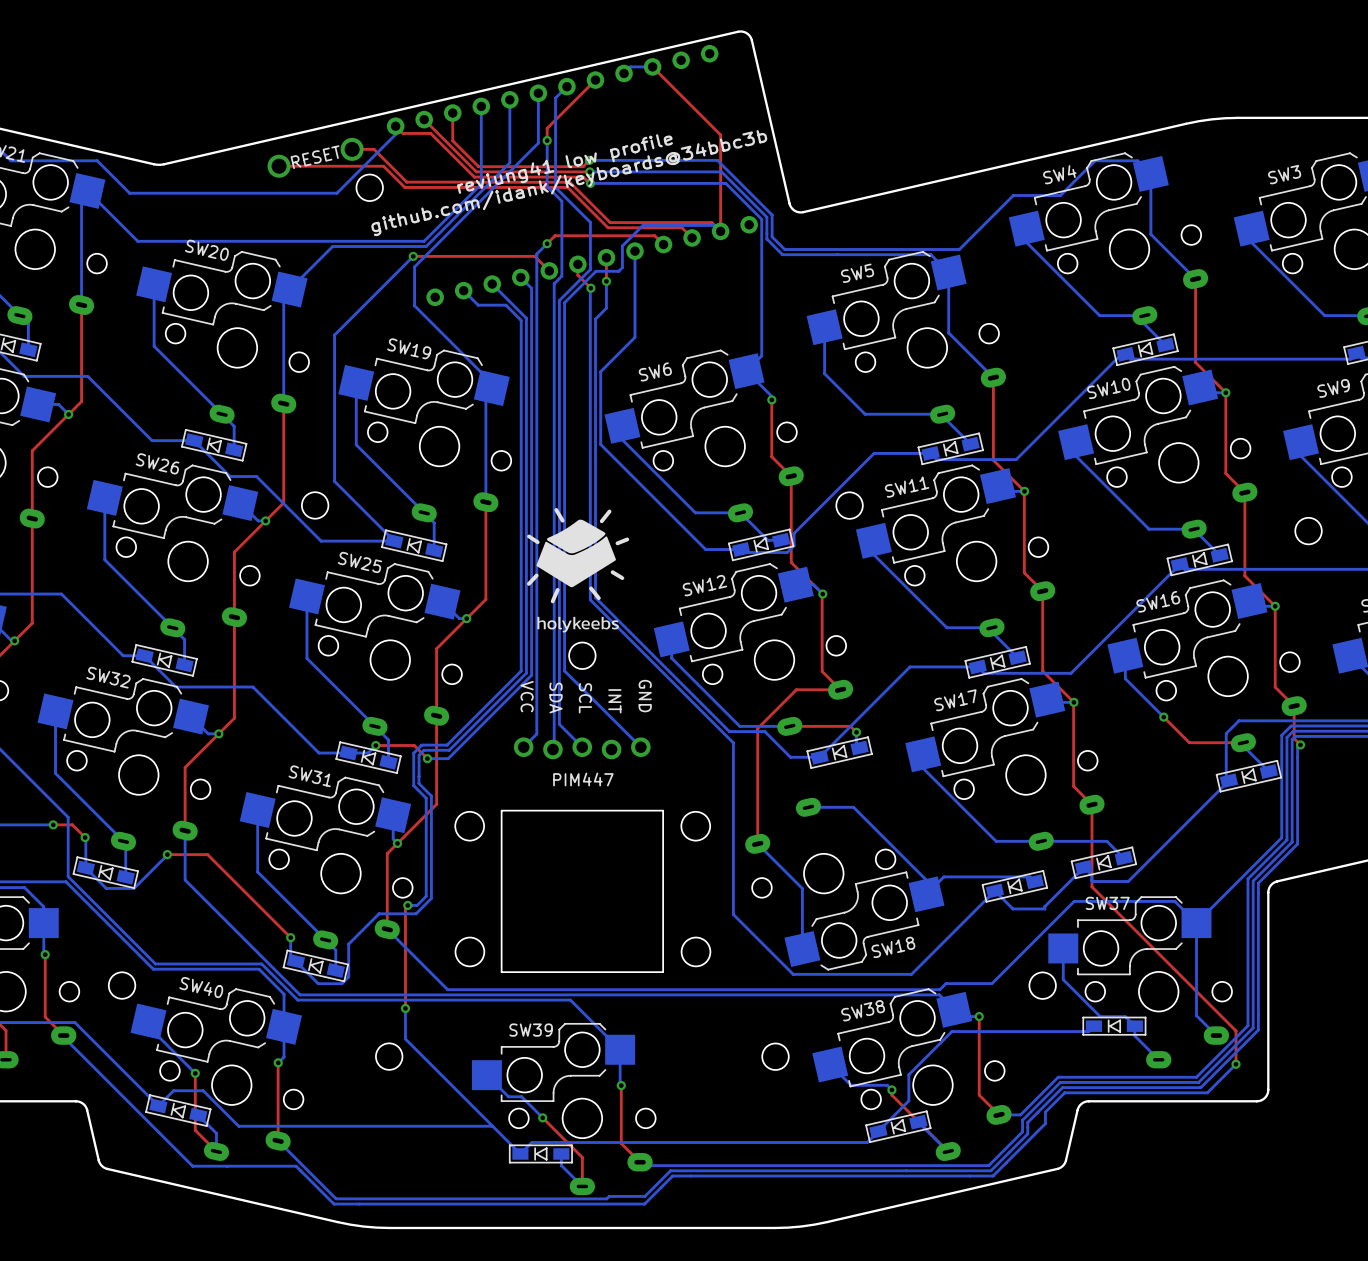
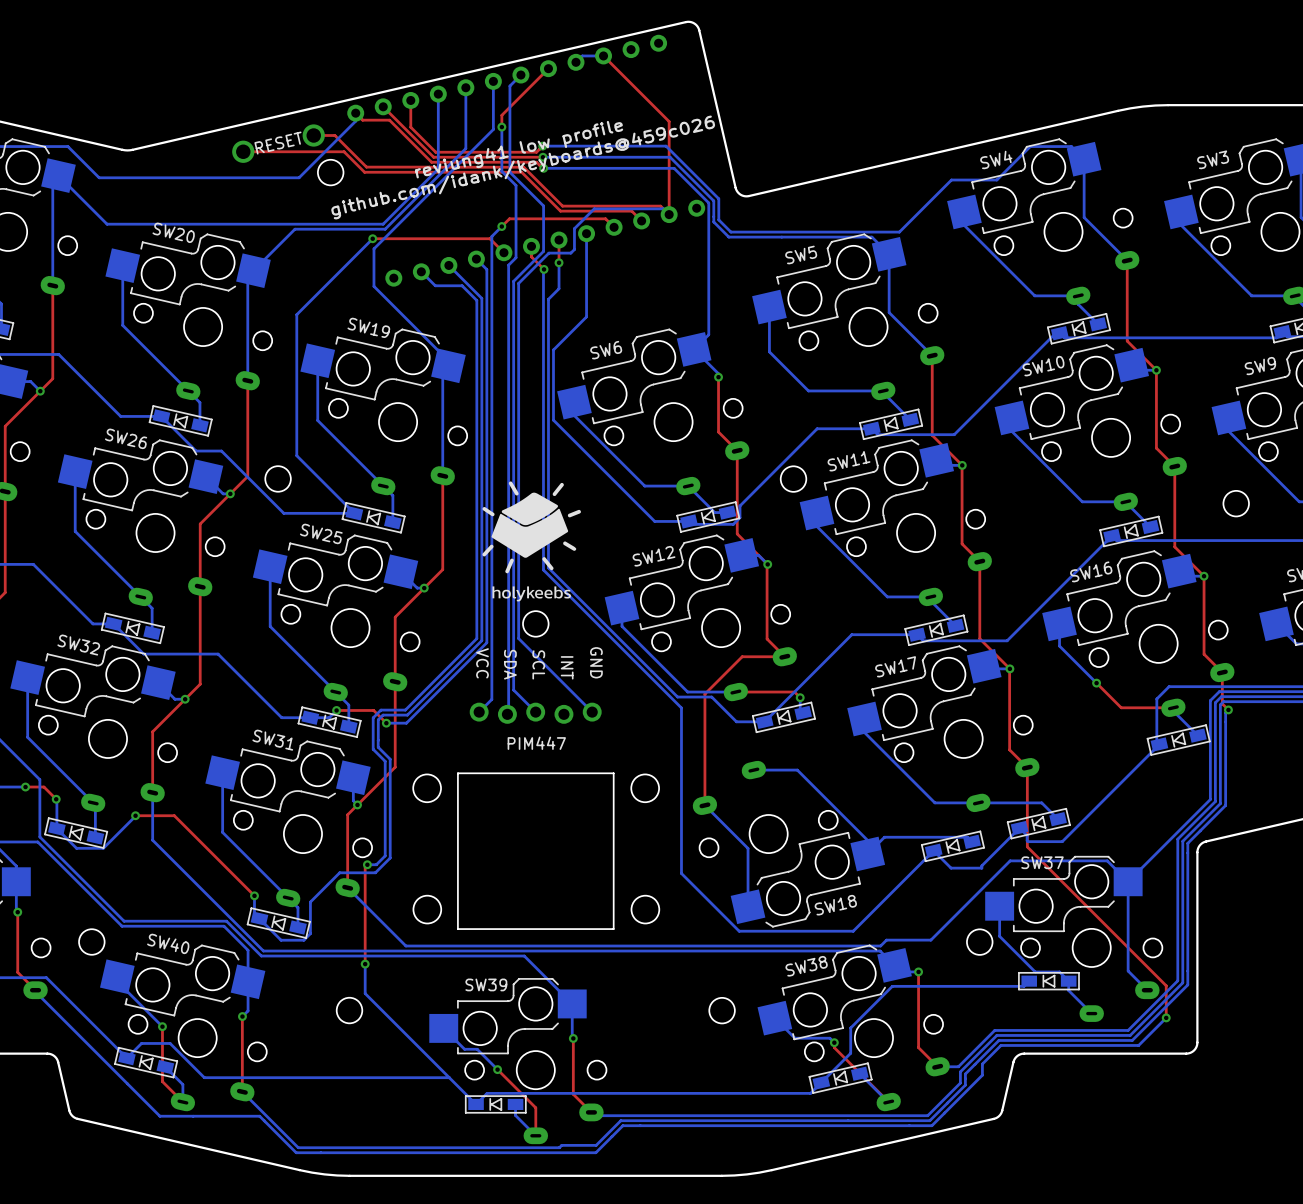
text: github.com/idank/keyboards@34bbc3b (569, 183) -> github.com/idank/keyboards@459c026 (523, 167)

